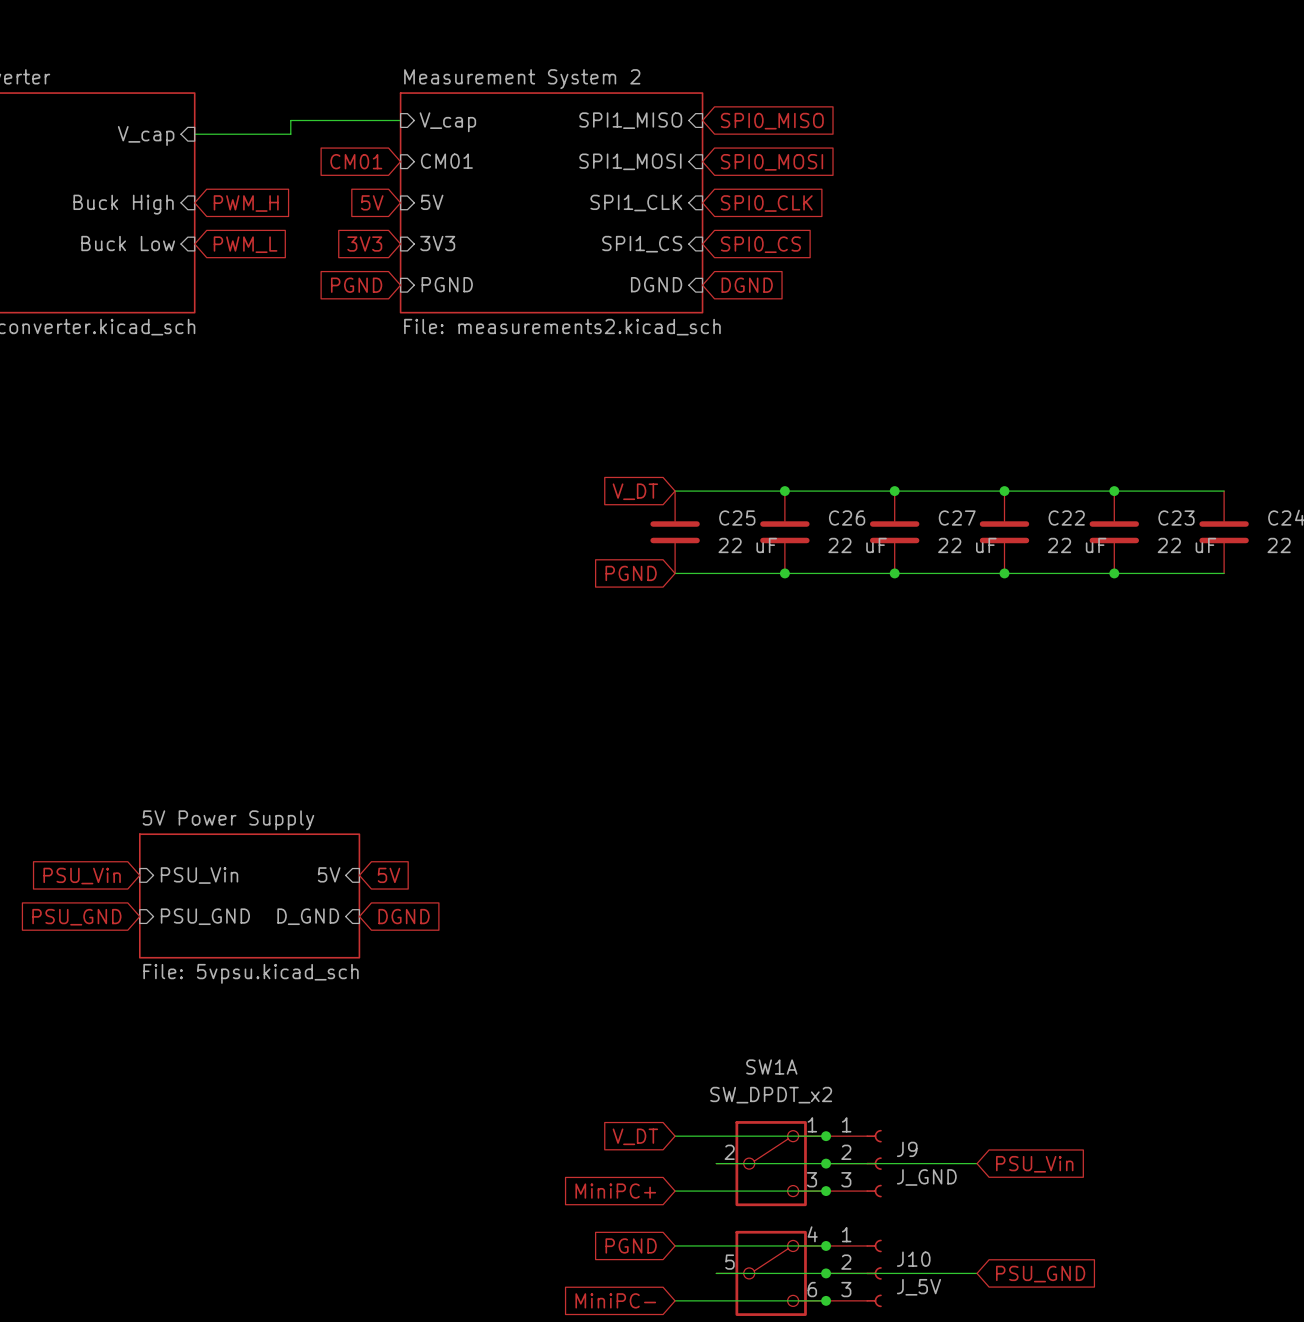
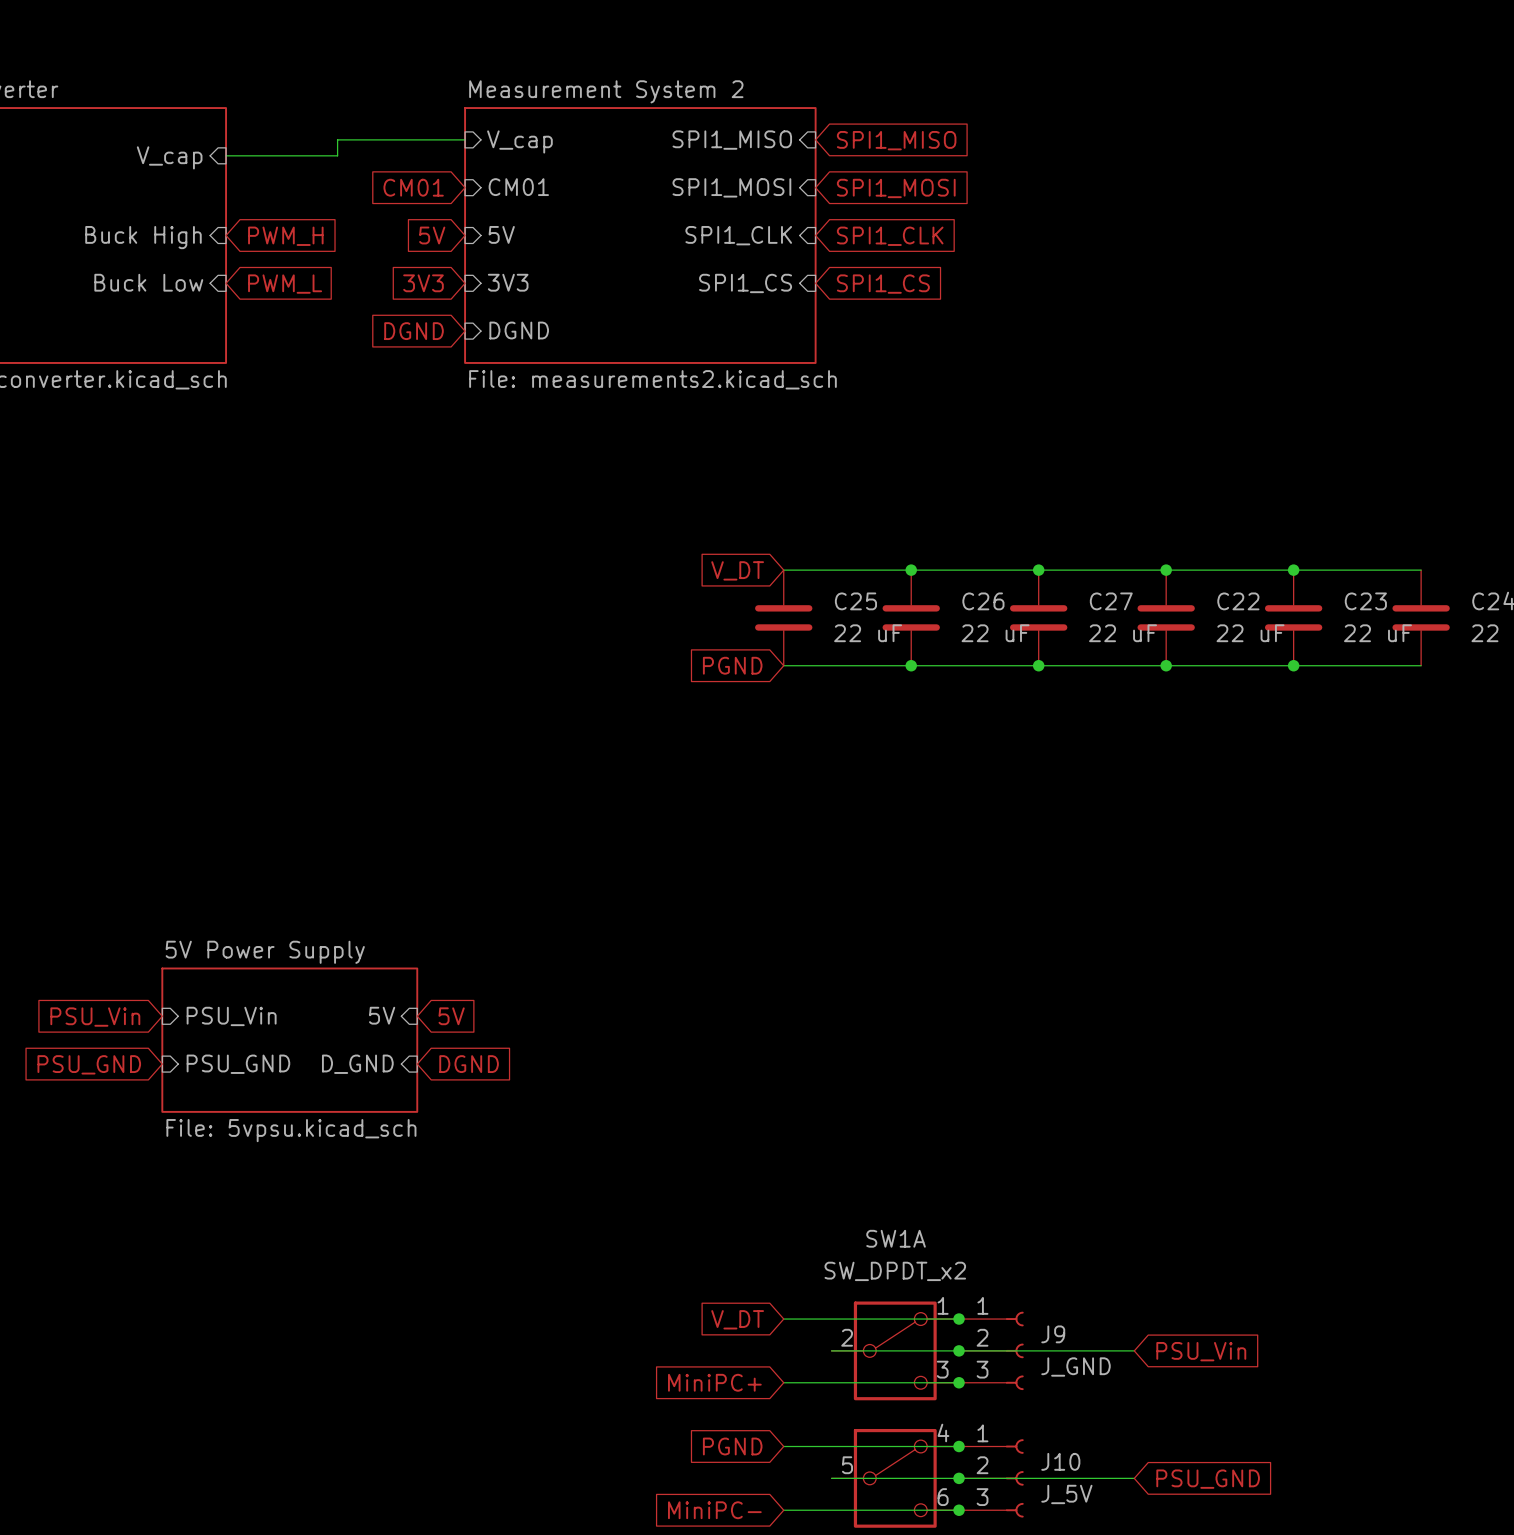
global label: SPI0_MISO (772, 121) -> SPI1_MISO (896, 140)
global label: SPI0_MOSI (772, 162) -> SPI1_MOSI (896, 188)
global label: SPI0_CLK (766, 203) -> SPI1_CLK (890, 236)
global label: SPI0_CS (760, 244) -> SPI1_CS (883, 284)
sheet pin: PGND (447, 284) -> DGND (519, 330)
sheet pin: DGND (656, 284) -> none
global label: PGND (356, 285) -> DGND (414, 331)
global label: DGND (747, 285) -> none

